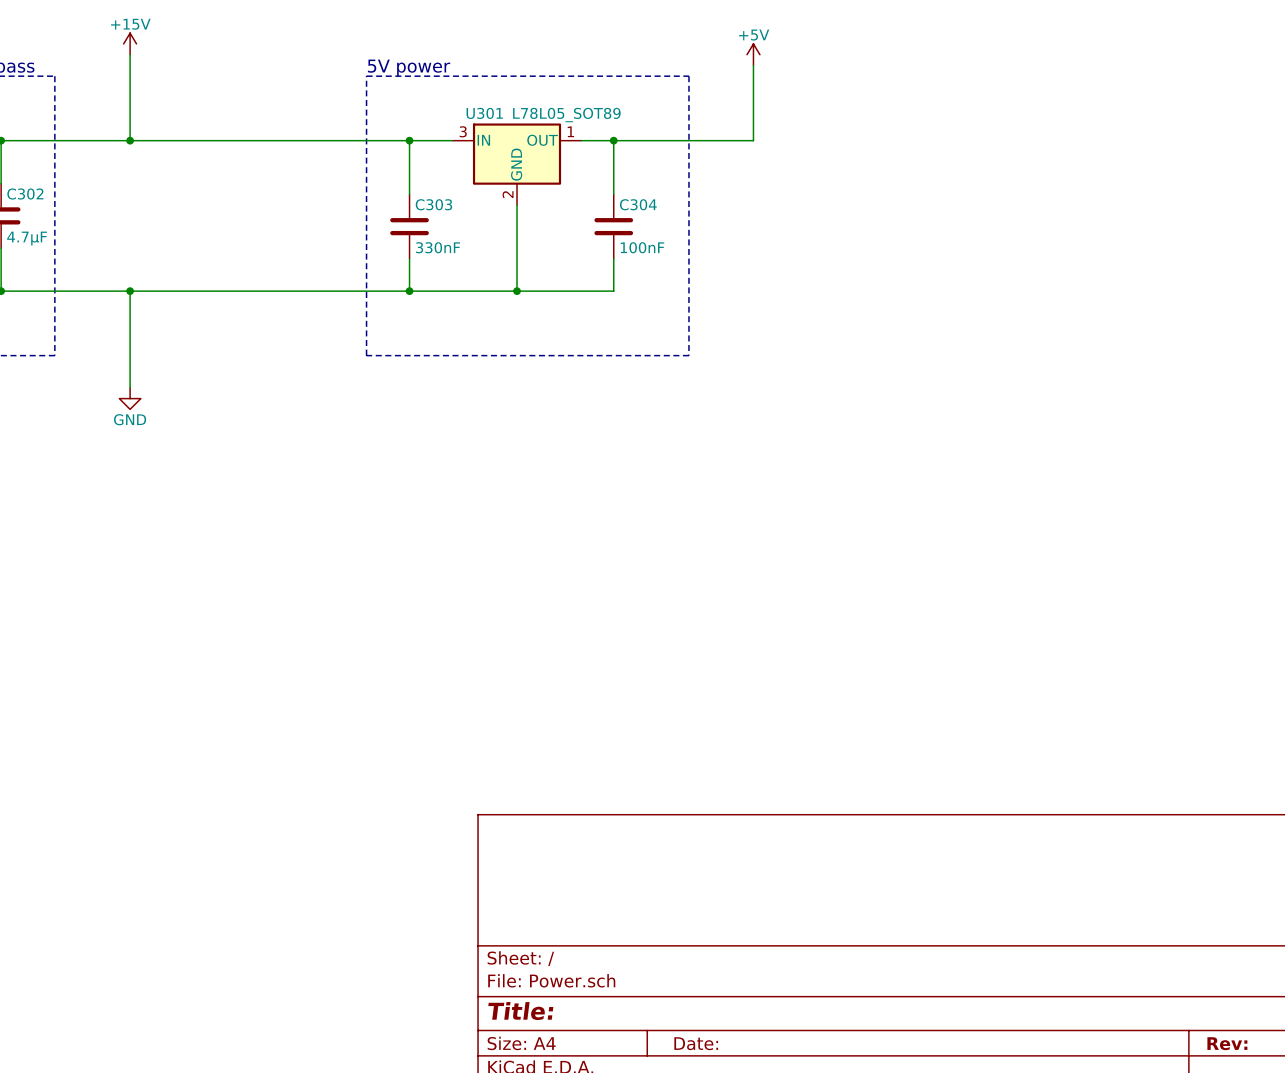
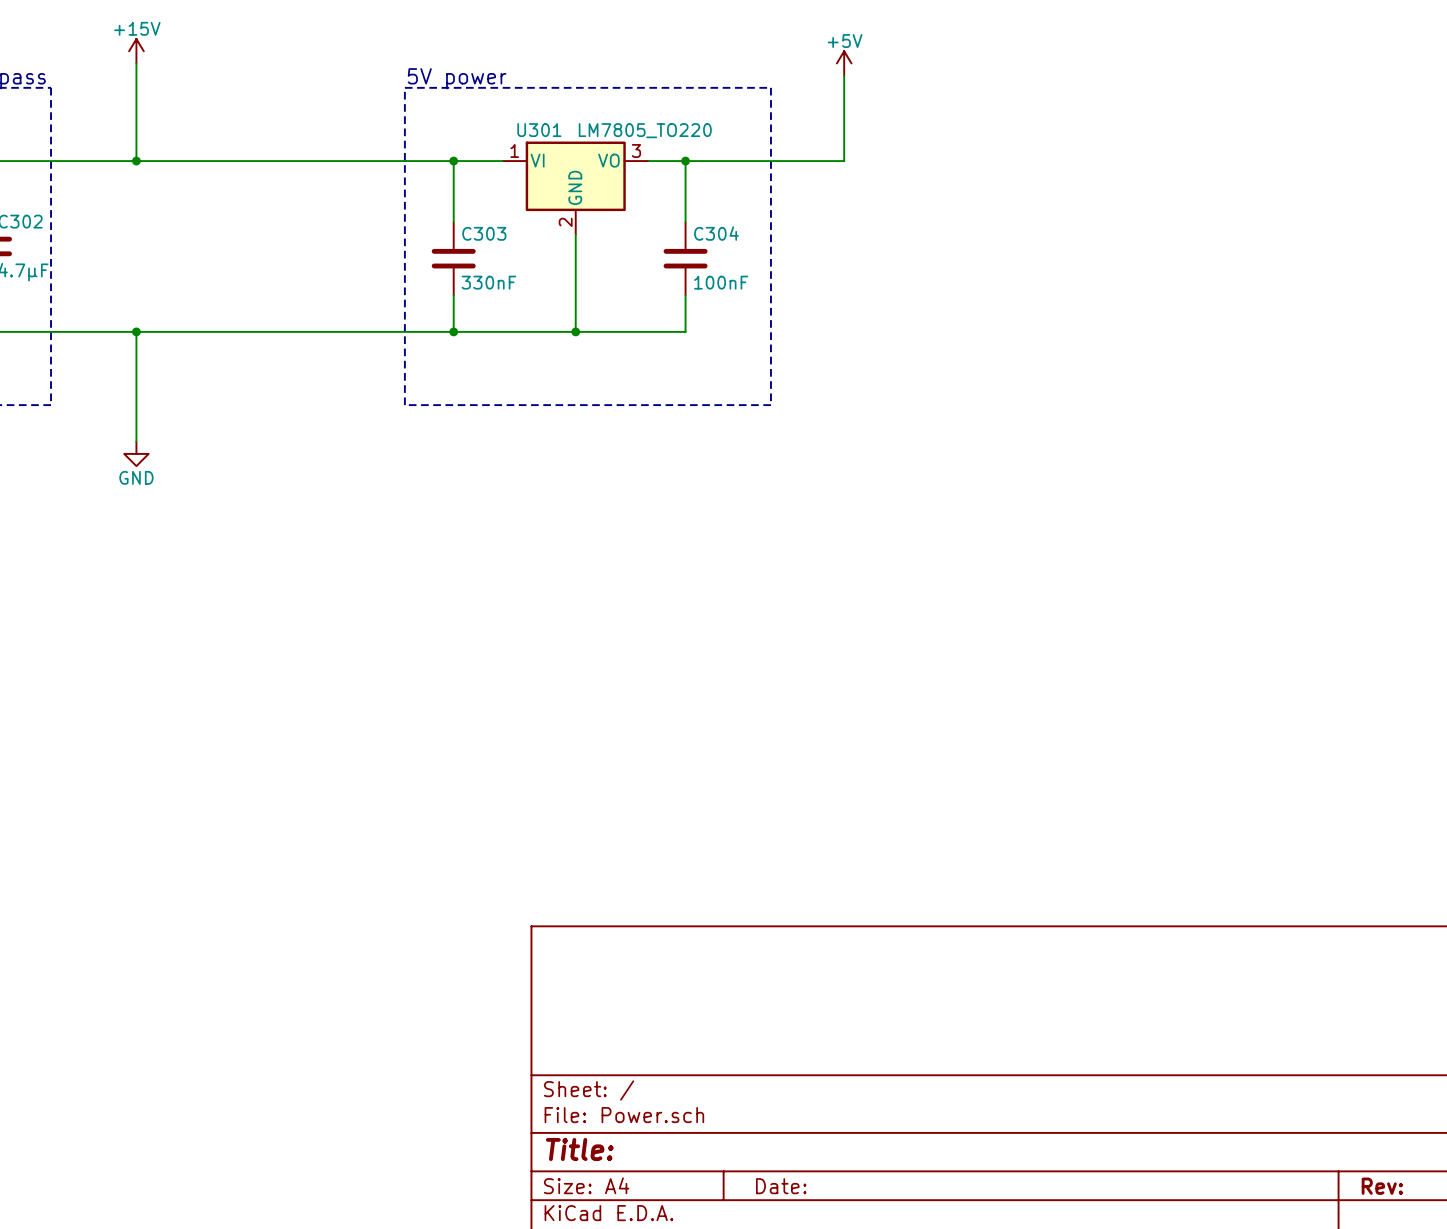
U301 value: L78L05_SOT89 (566, 115) -> LM7805_TO220 (645, 130)
U301 pin number: 3 (463, 131) -> 1 (514, 150)
U301 pin number: 1 (570, 131) -> 3 (636, 150)
U301 pin name: IN (483, 140) -> VI (537, 160)
U301 pin name: OUT (542, 140) -> VO (608, 160)

